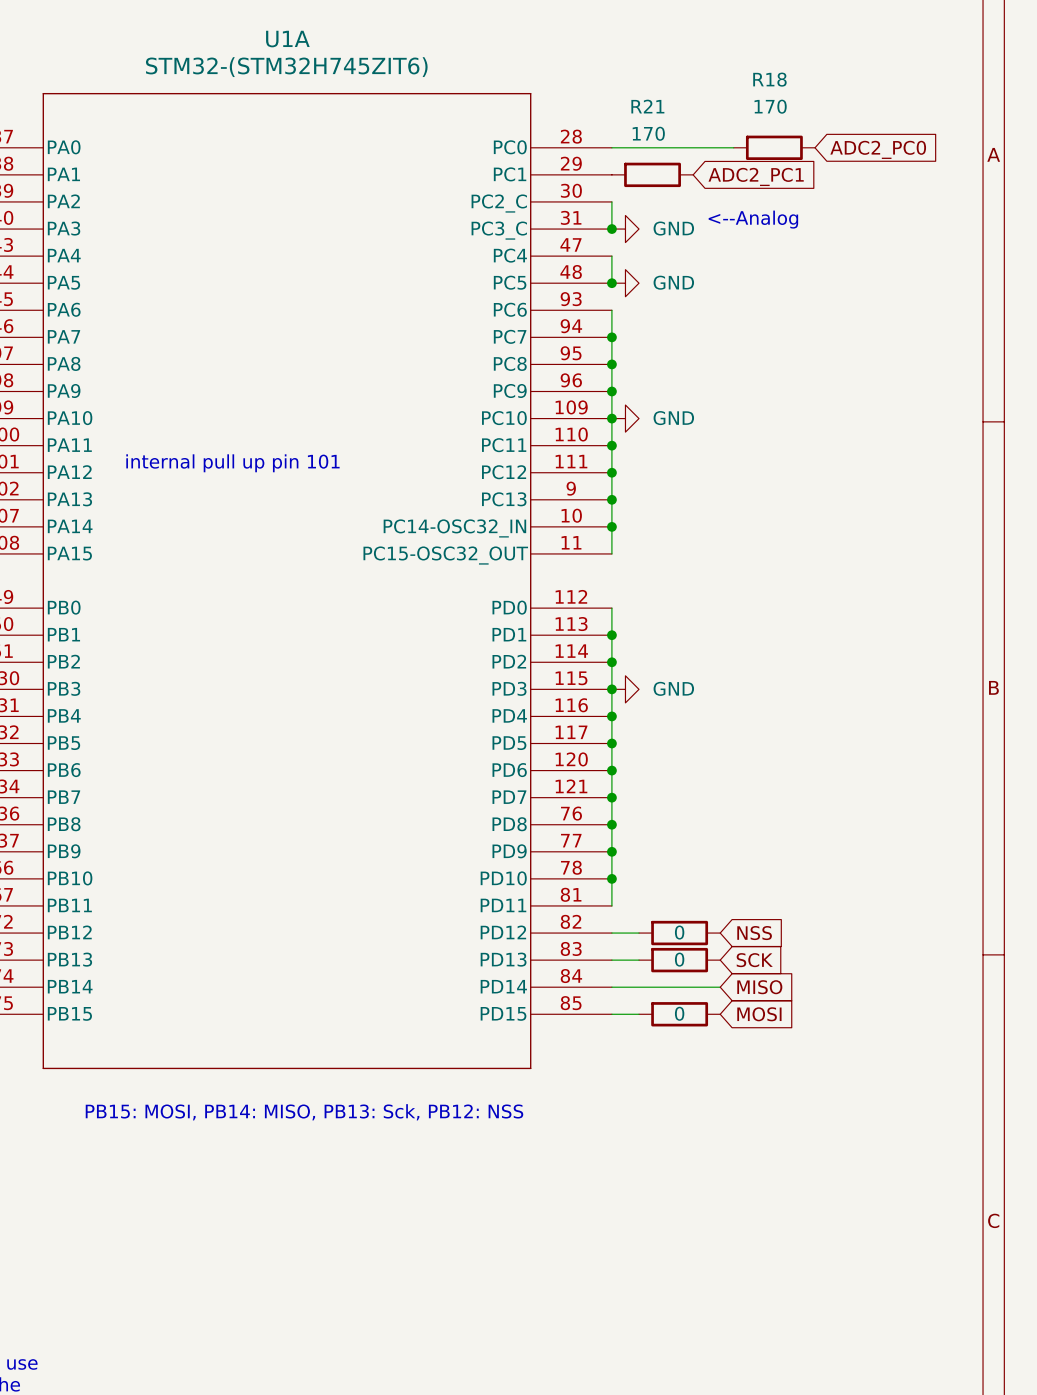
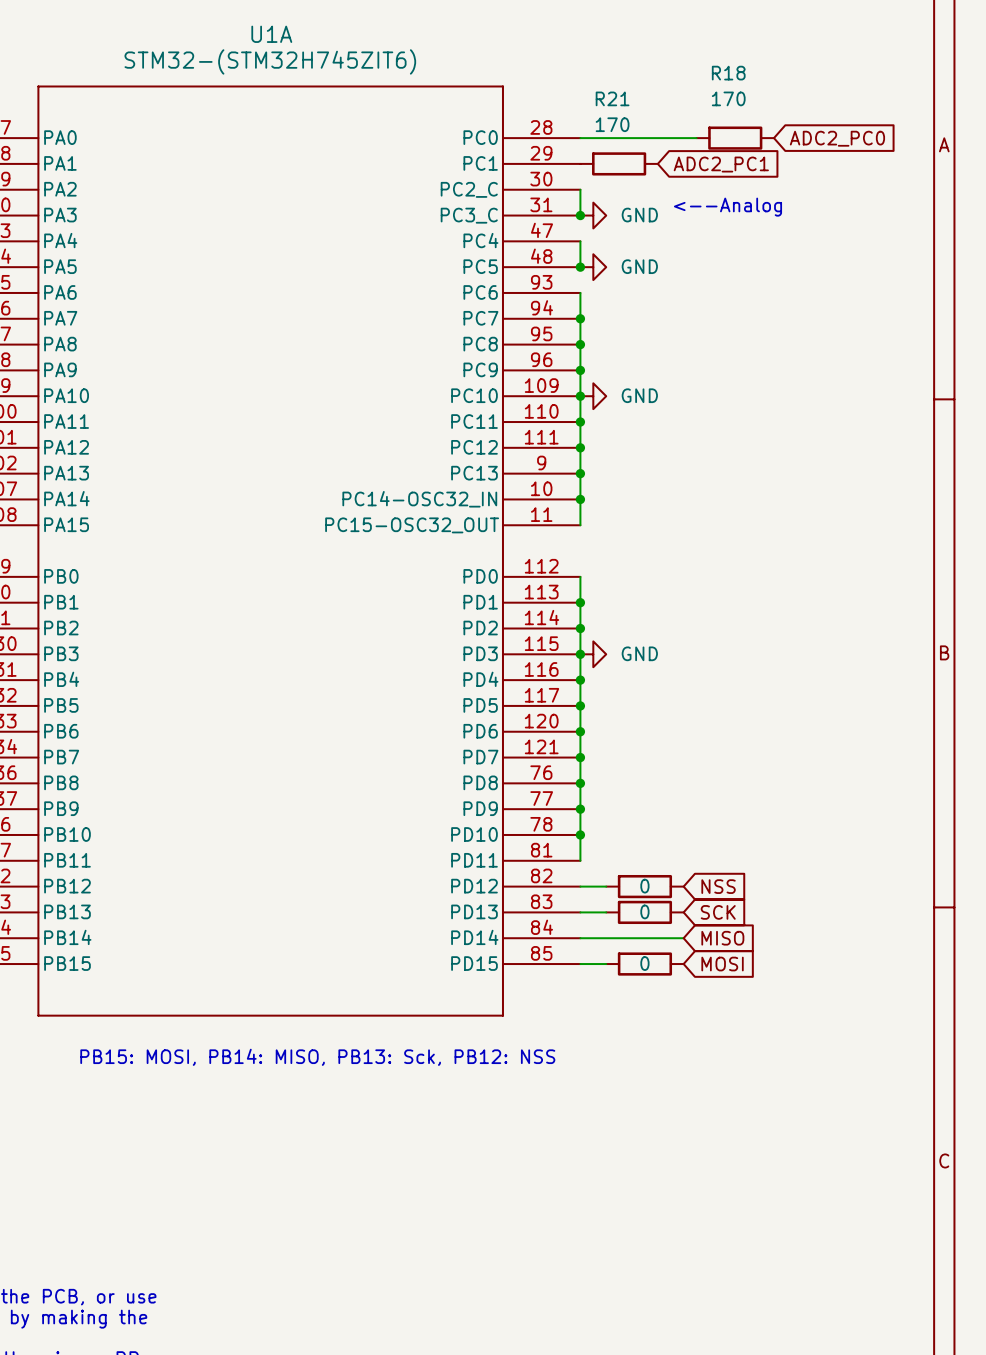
text: internal pull up pin 101 (232, 463) -> none

